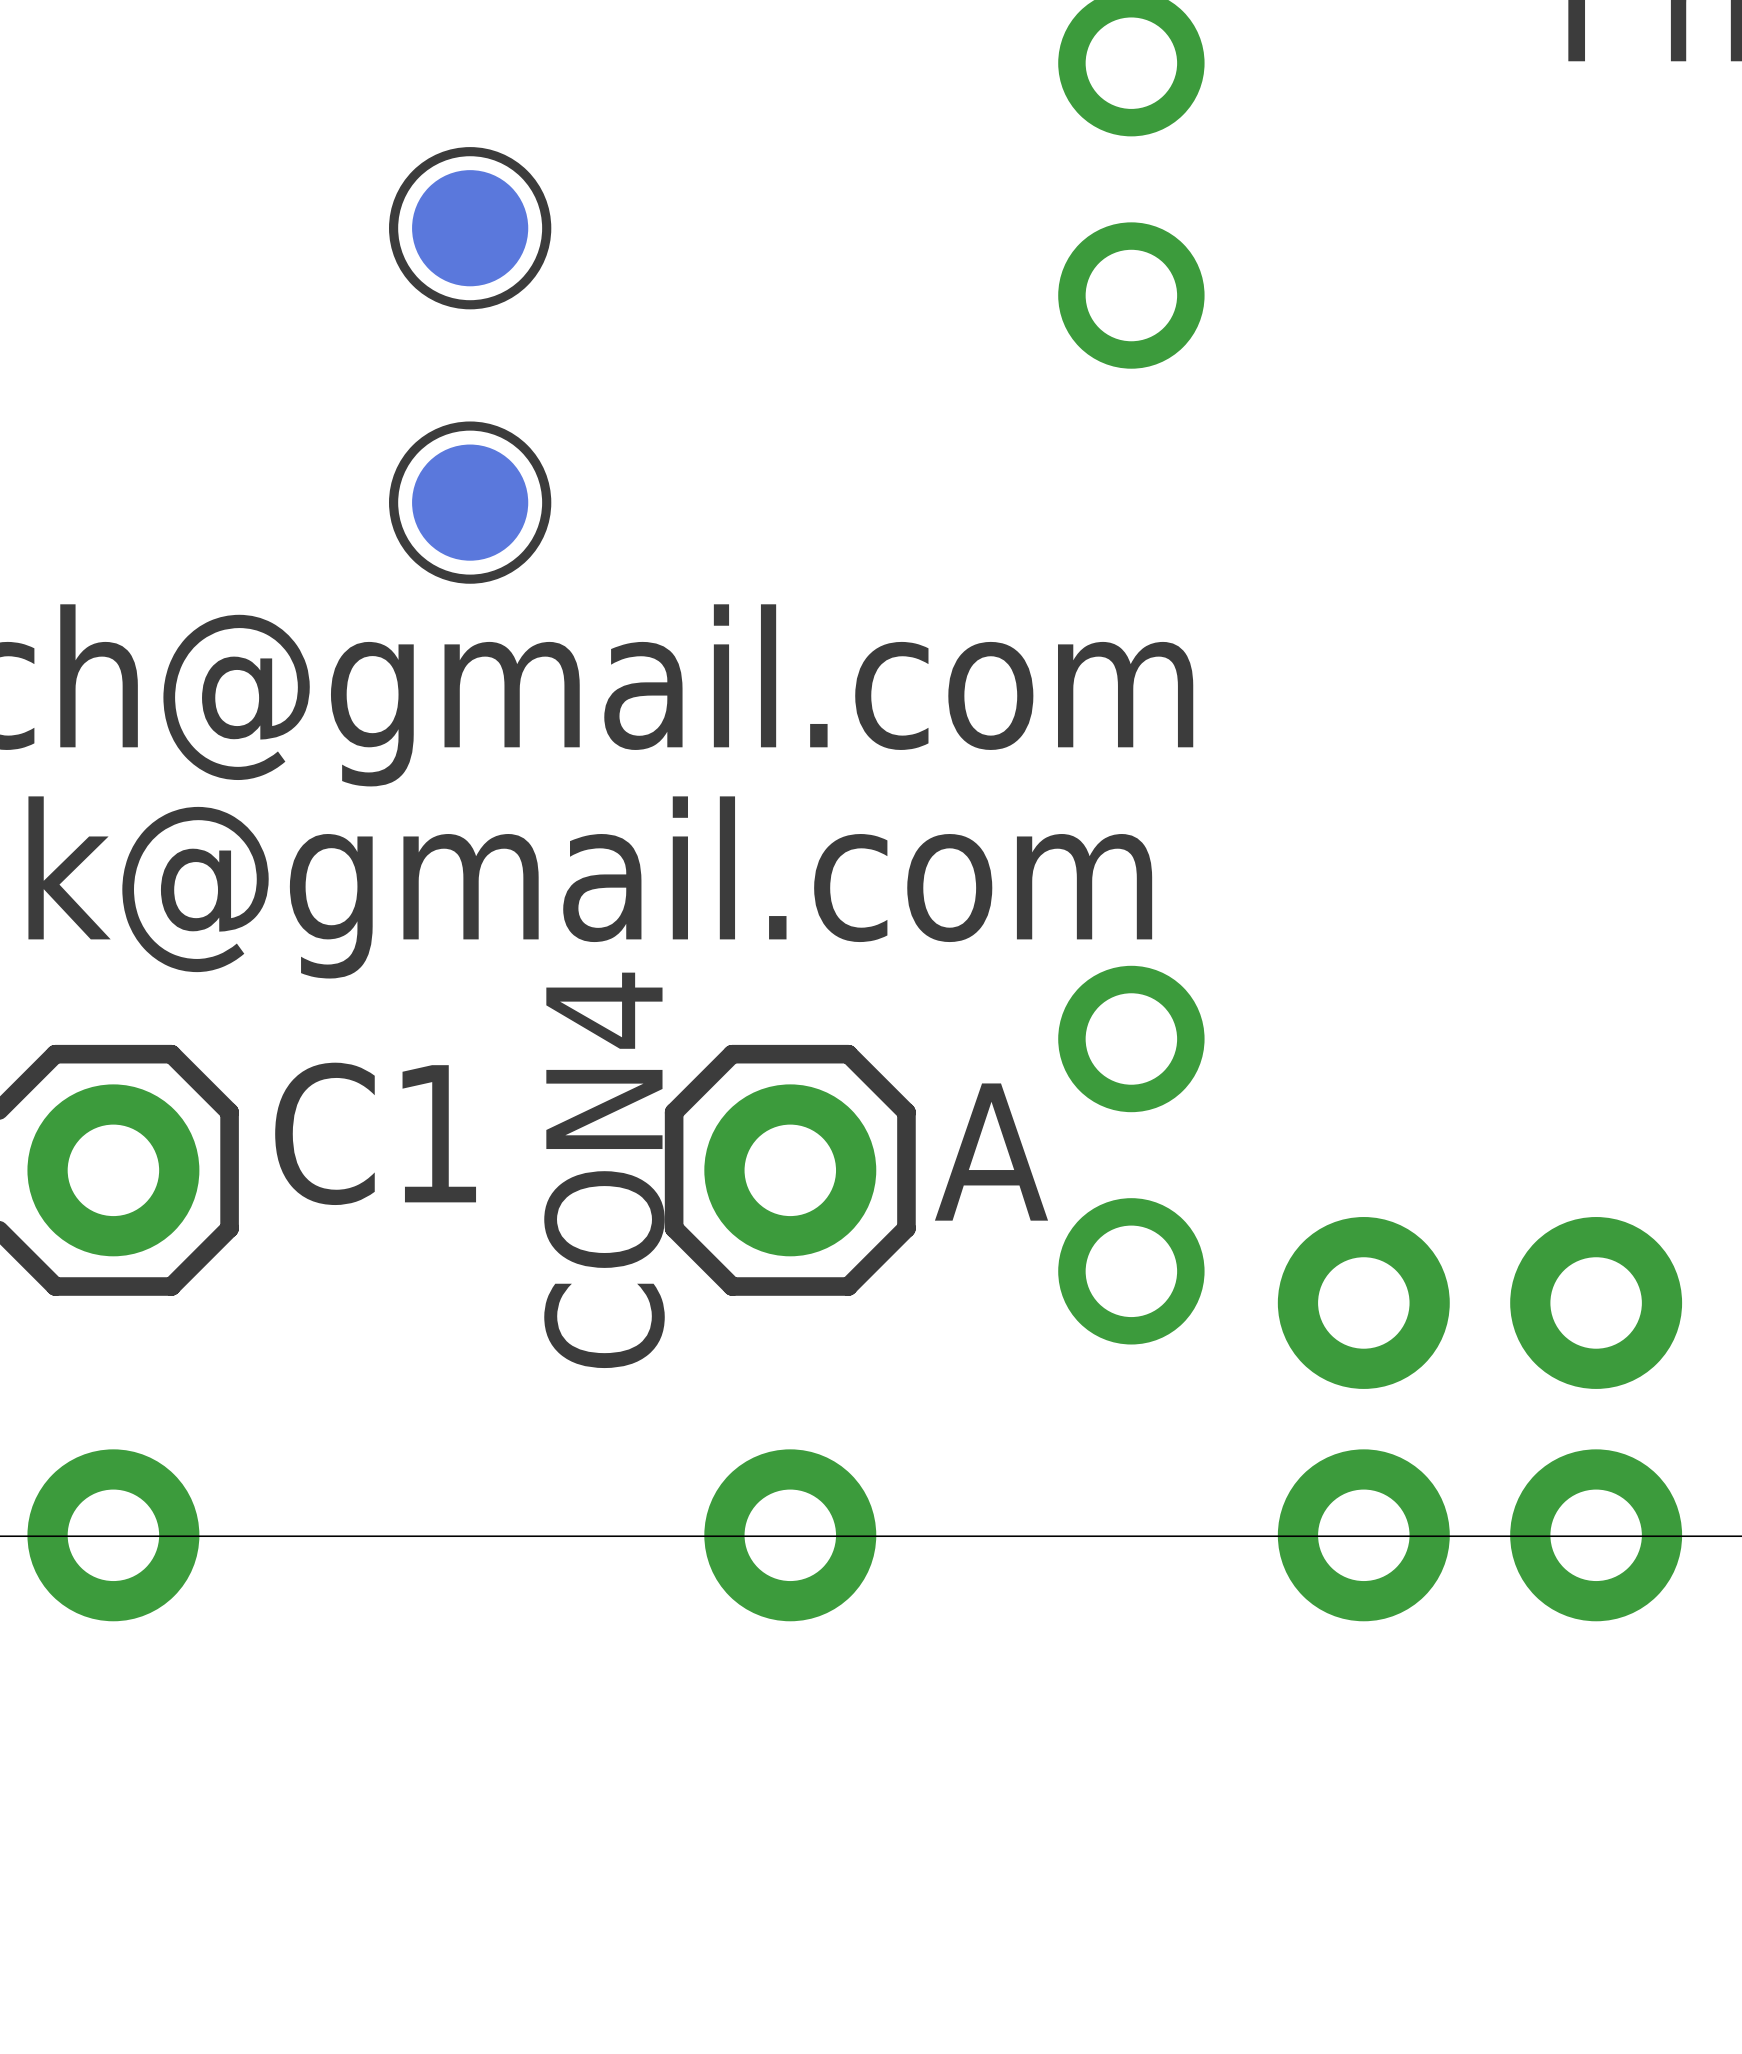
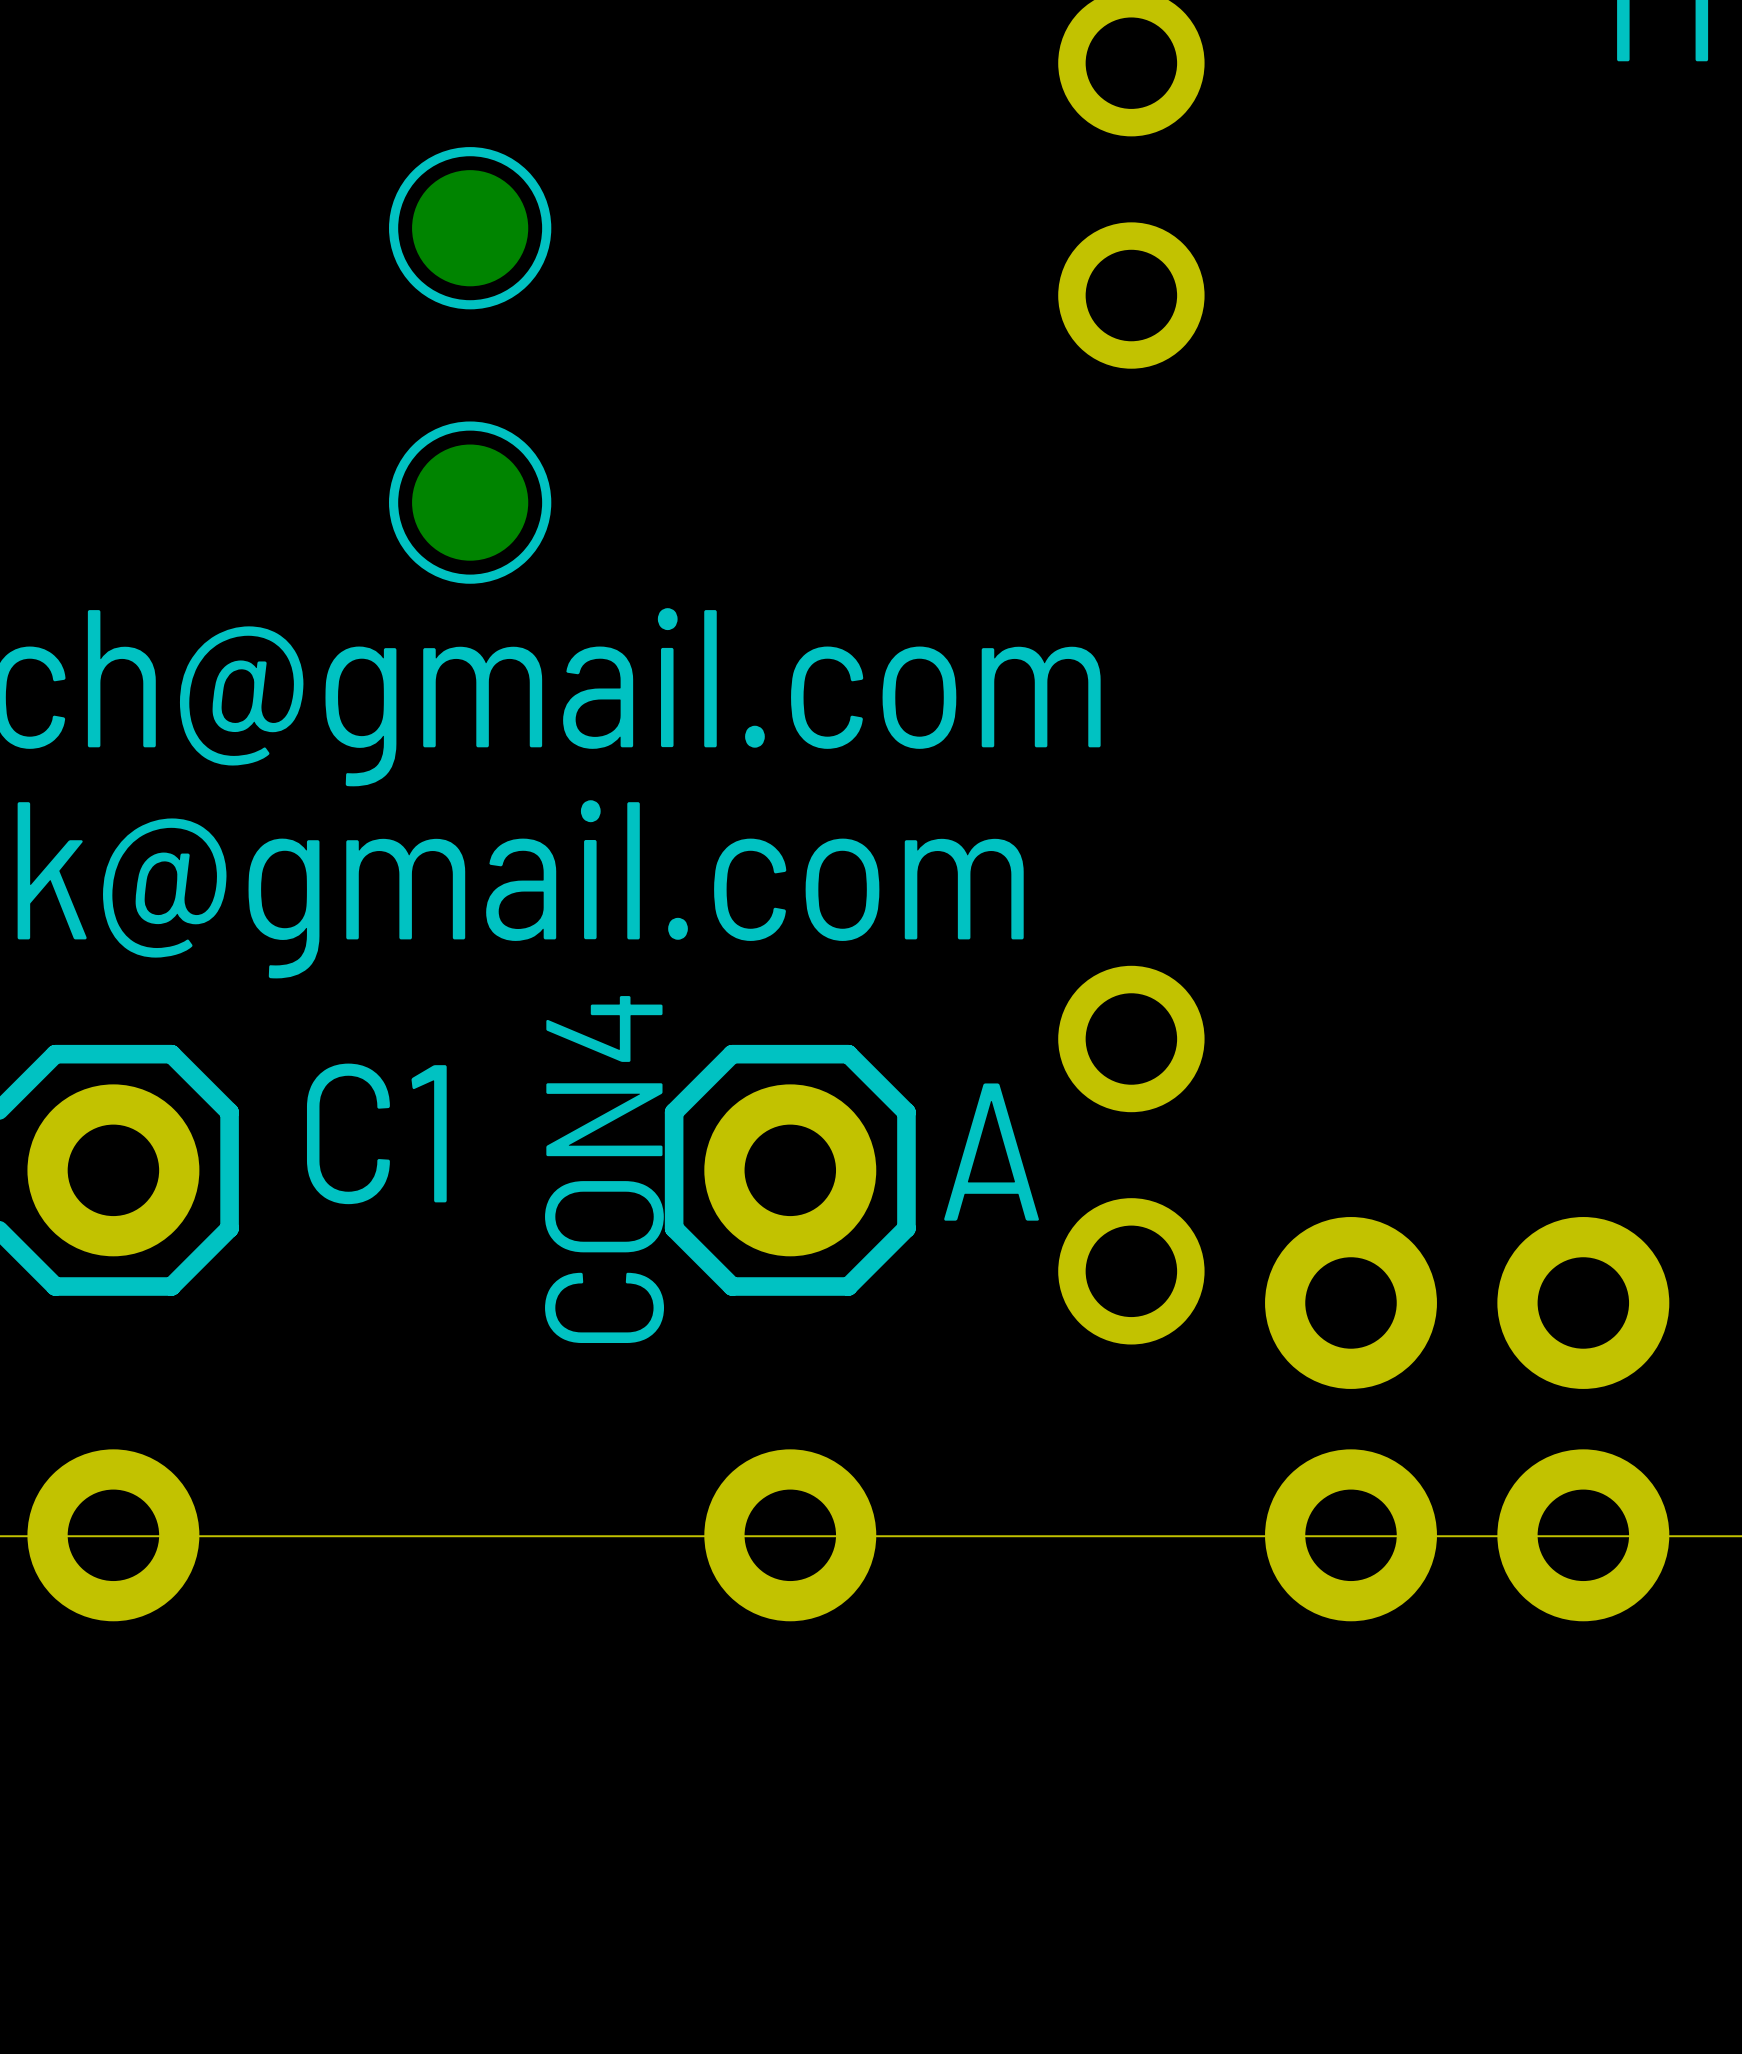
part position: (1479, 1302) -> (1467, 1302)
part position: (1479, 1535) -> (1467, 1535)

